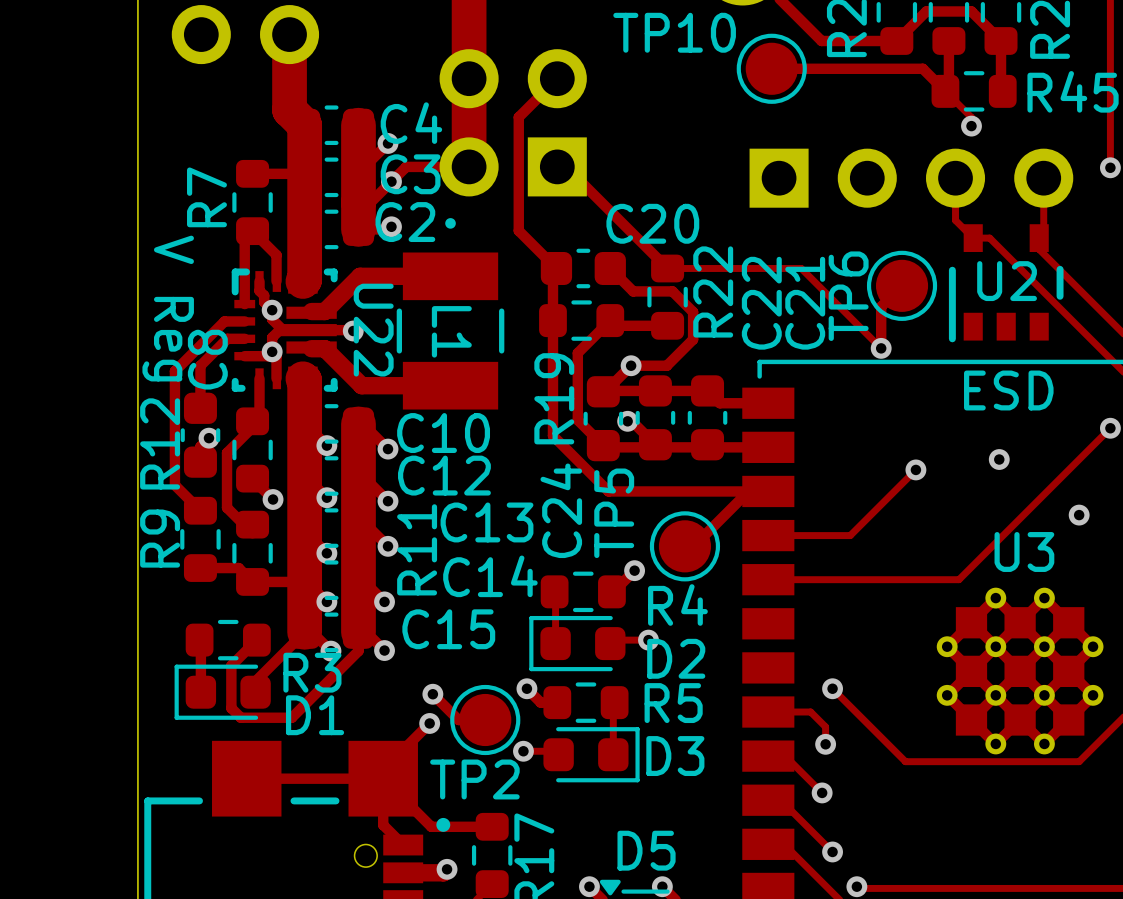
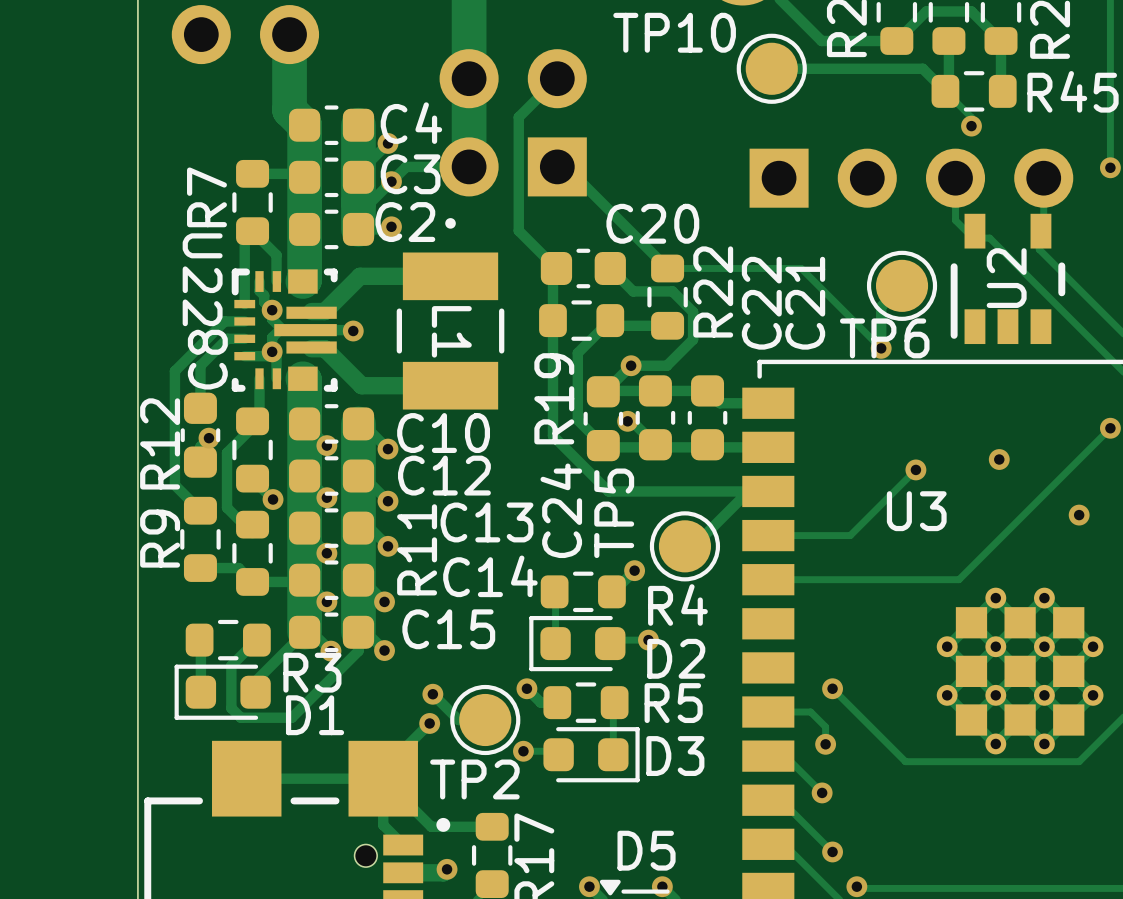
U2 footprint: [948, 224, 1064, 343] -> [950, 213, 1066, 345]
TP6 name rotation: 0° (848, 296) -> 90° clockwise (884, 338)
U22 text: V Reg (168, 308) -> none
U22 name position: U22 (373, 330) -> U22 (202, 279)
U3 name position: U3 (1024, 551) -> U3 (916, 511)

